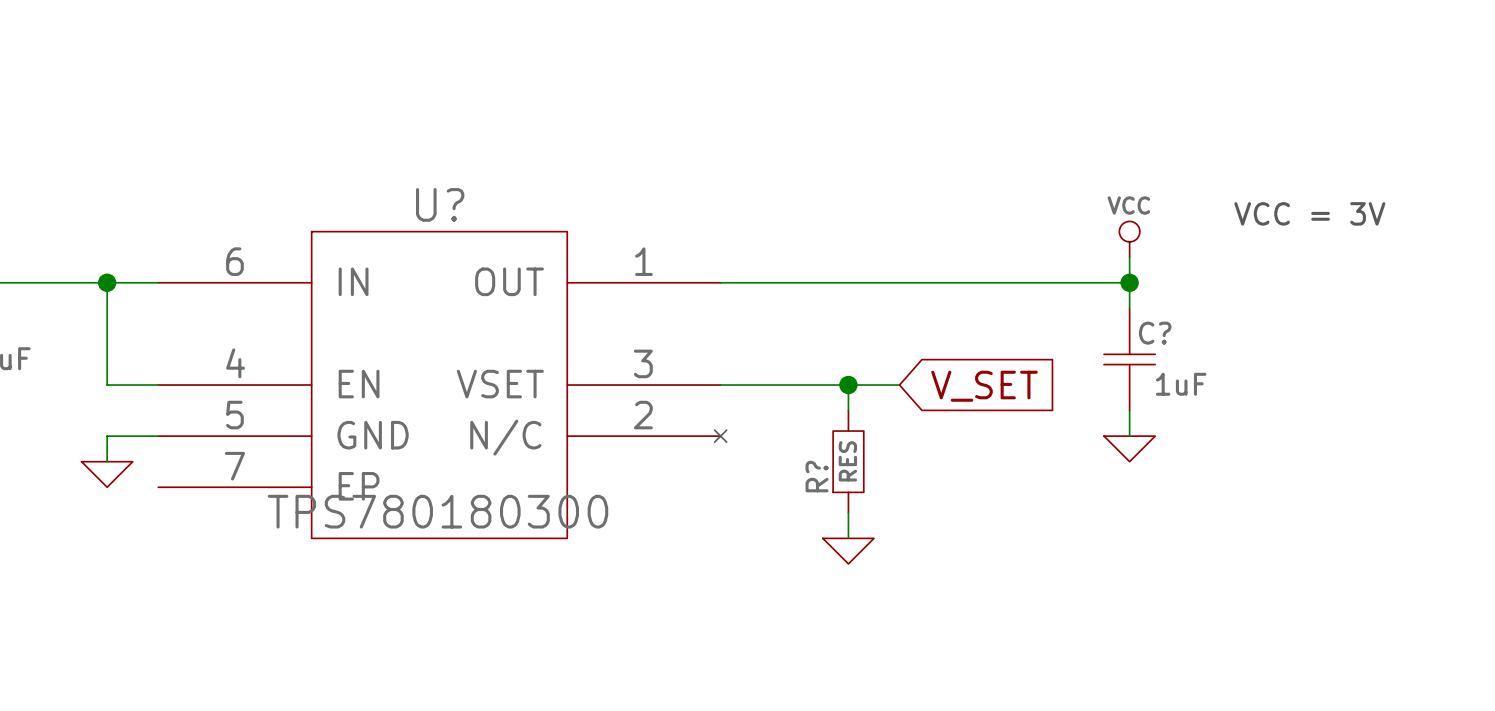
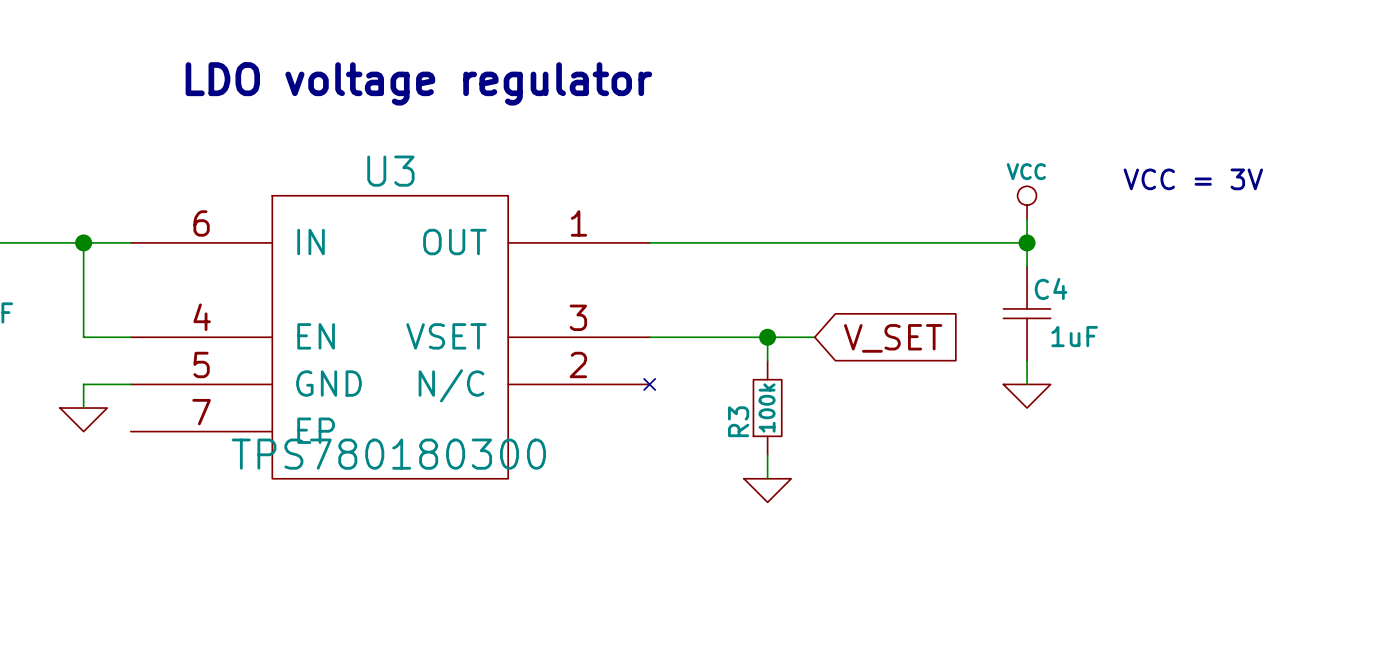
text: none -> LDO voltage regulator (418, 83)
U? name: U? (440, 204) -> U3 (390, 171)
C? name: C? (1155, 333) -> C4 (1051, 288)
R? value: RES (847, 461) -> 100k (767, 408)
R? name: R? (817, 476) -> R3 (738, 421)

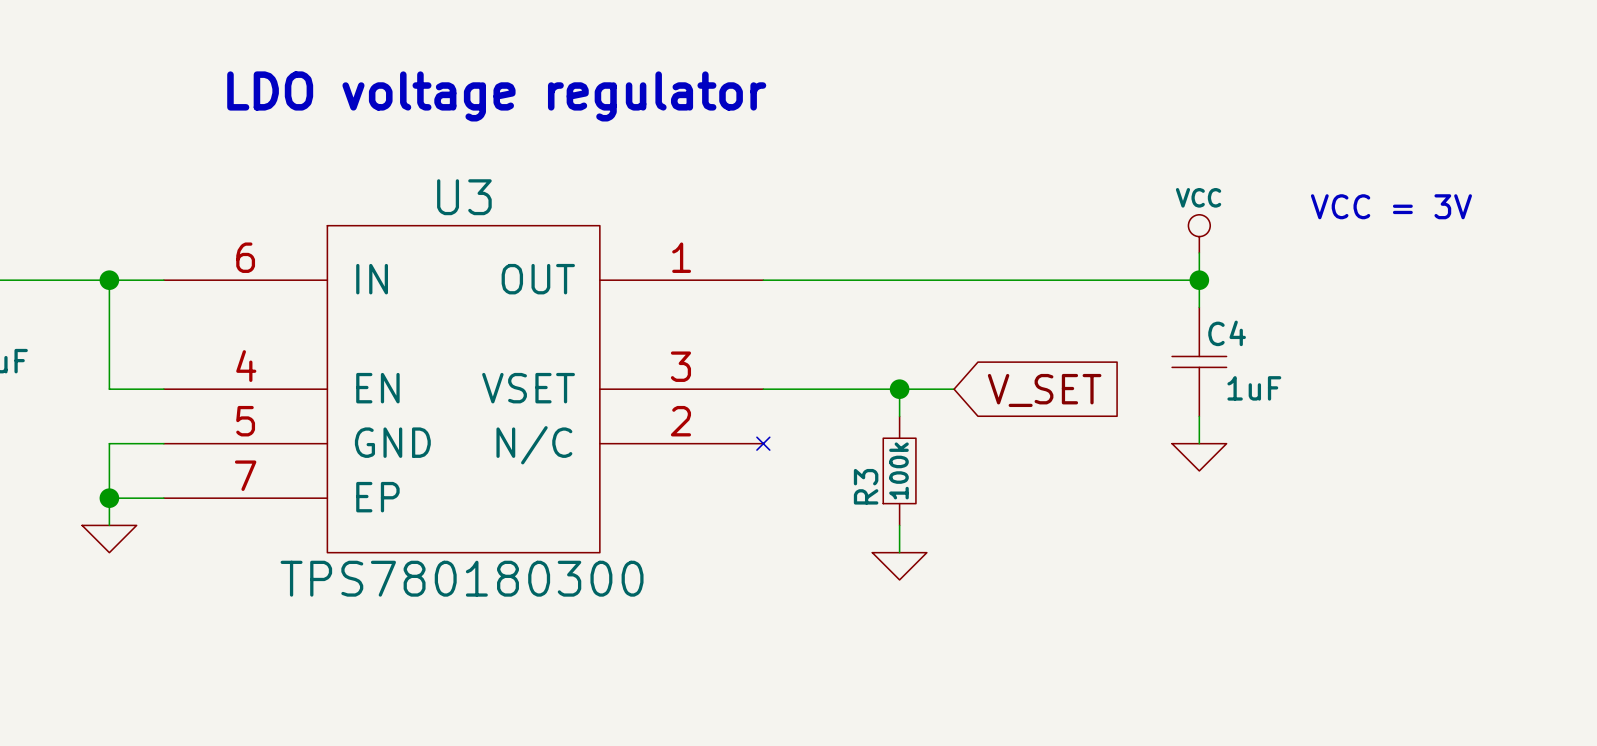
wire: none -> (109, 470) (109, 525)
power symbol position: (83, 419) -> (109, 539)
wire: none -> (109, 498) (163, 498)
junction: none -> (109, 498)
U3 value position: TPS780180300 (388, 454) -> TPS780180300 (462, 578)

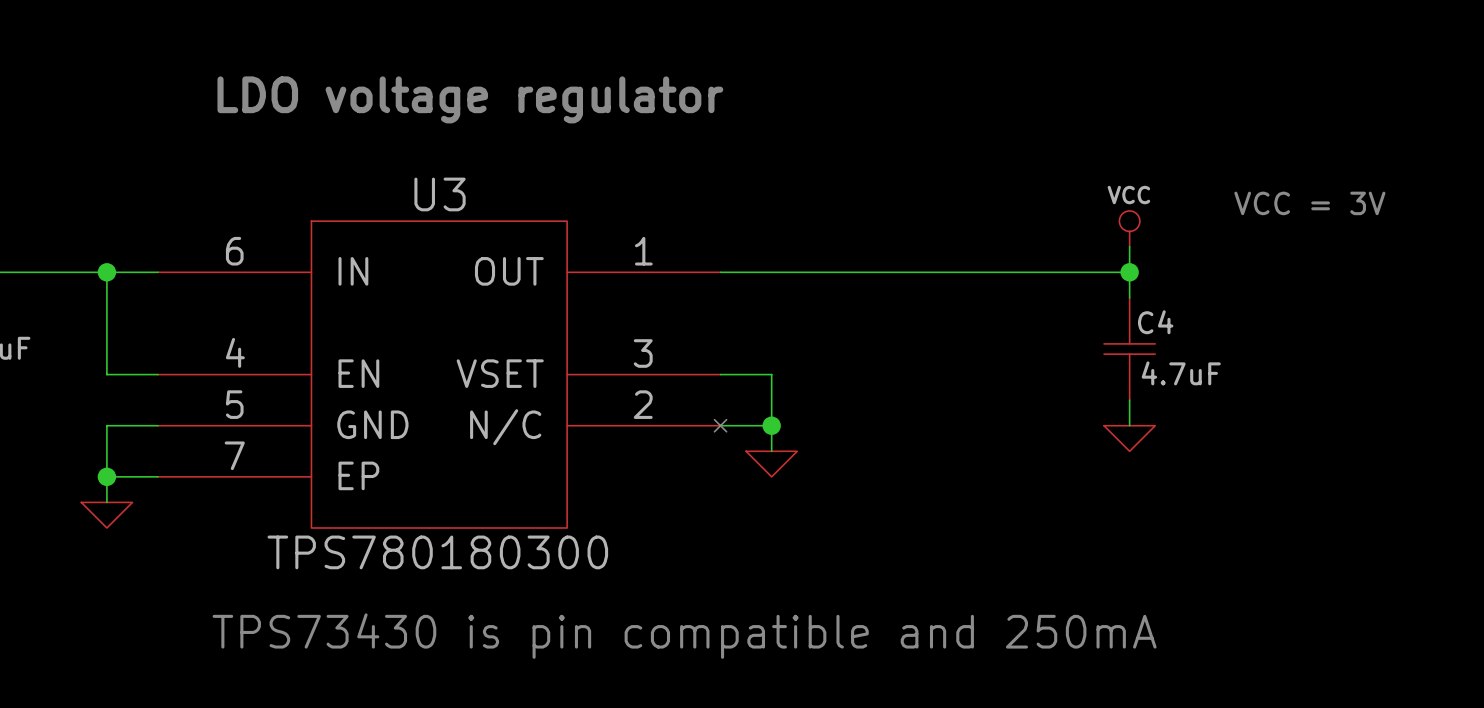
C4 value: 1uF (1254, 388) -> 4.7uF (1181, 373)
wire: (817, 389) (954, 389) -> (771, 374) (771, 451)
wire: (899, 389) (899, 416) -> none
junction position: (899, 389) -> (771, 425)
global label: V_SET (1044, 390) -> none
wire: none -> (720, 425) (771, 425)
R3: 100k (899, 470) -> none
wire: (899, 525) (899, 552) -> none
power symbol position: (899, 566) -> (771, 464)
text: none -> TPS73430 is pin compatible and 250mA (684, 636)

